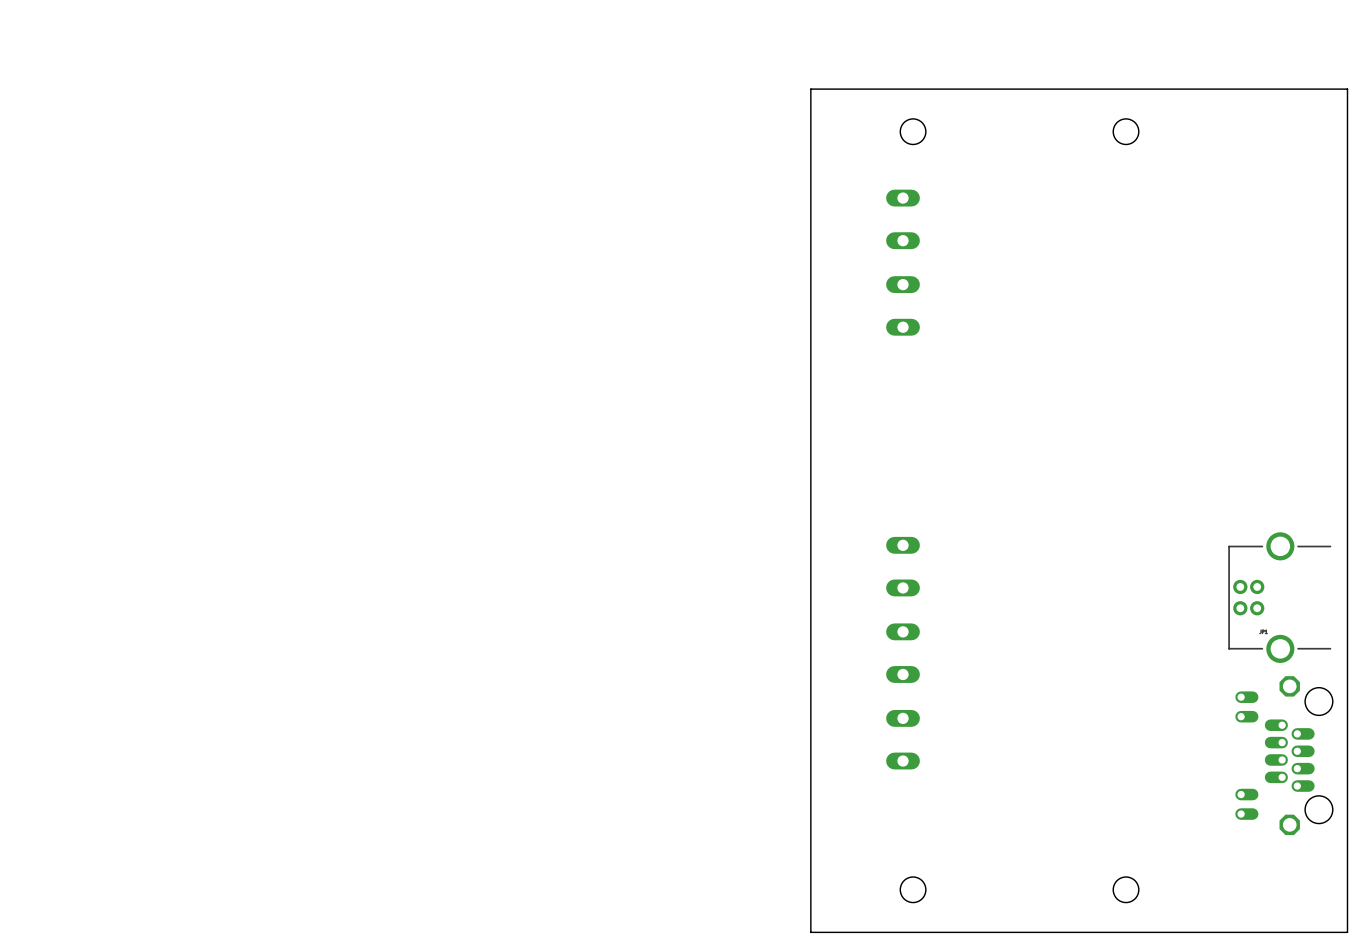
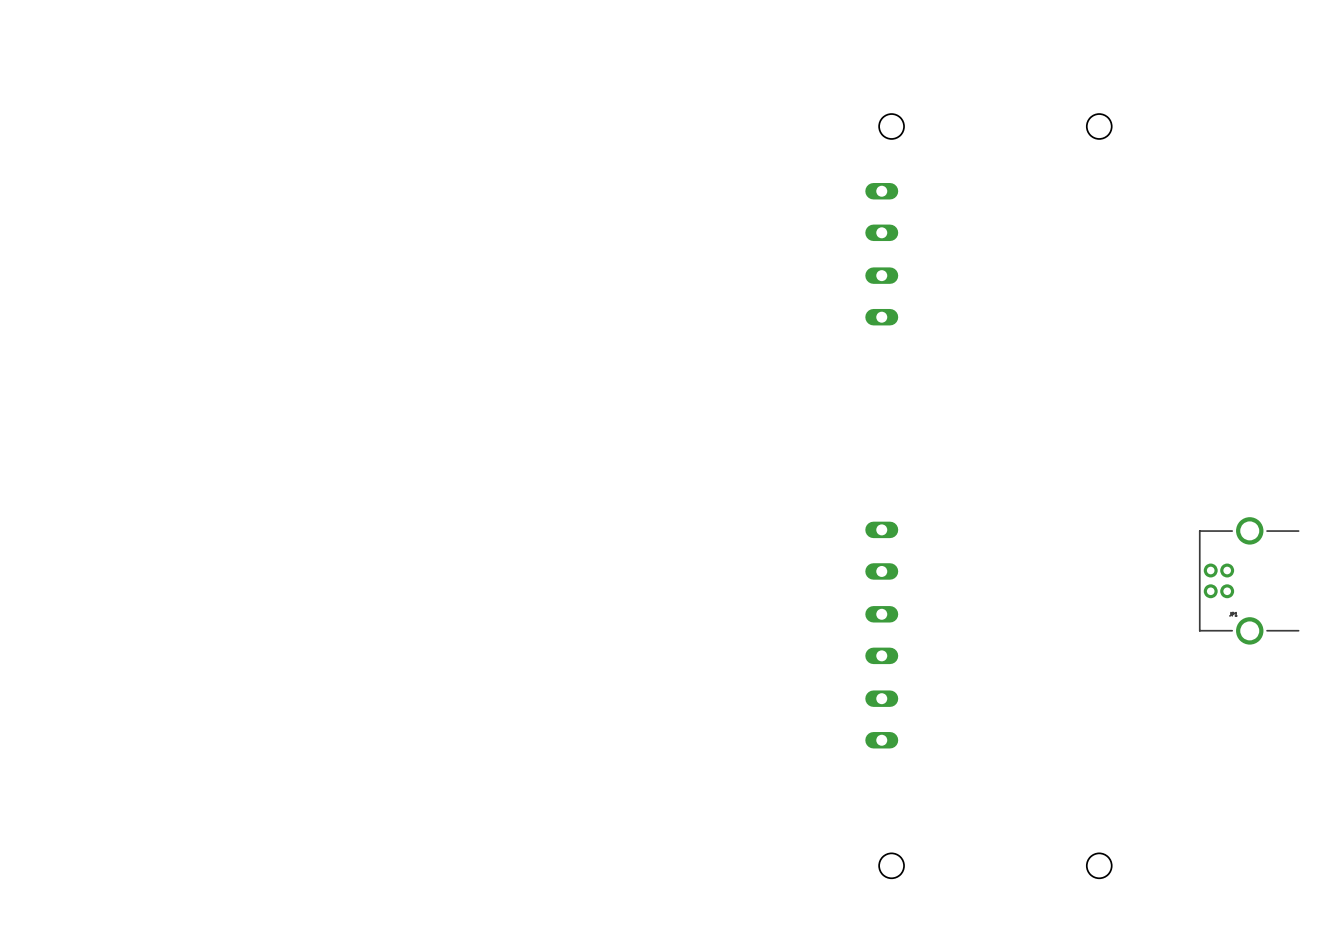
board edge: (1347, 89) (810, 89) (810, 932) (1347, 932) (1347, 89) -> none
part: (1284, 755) -> none

